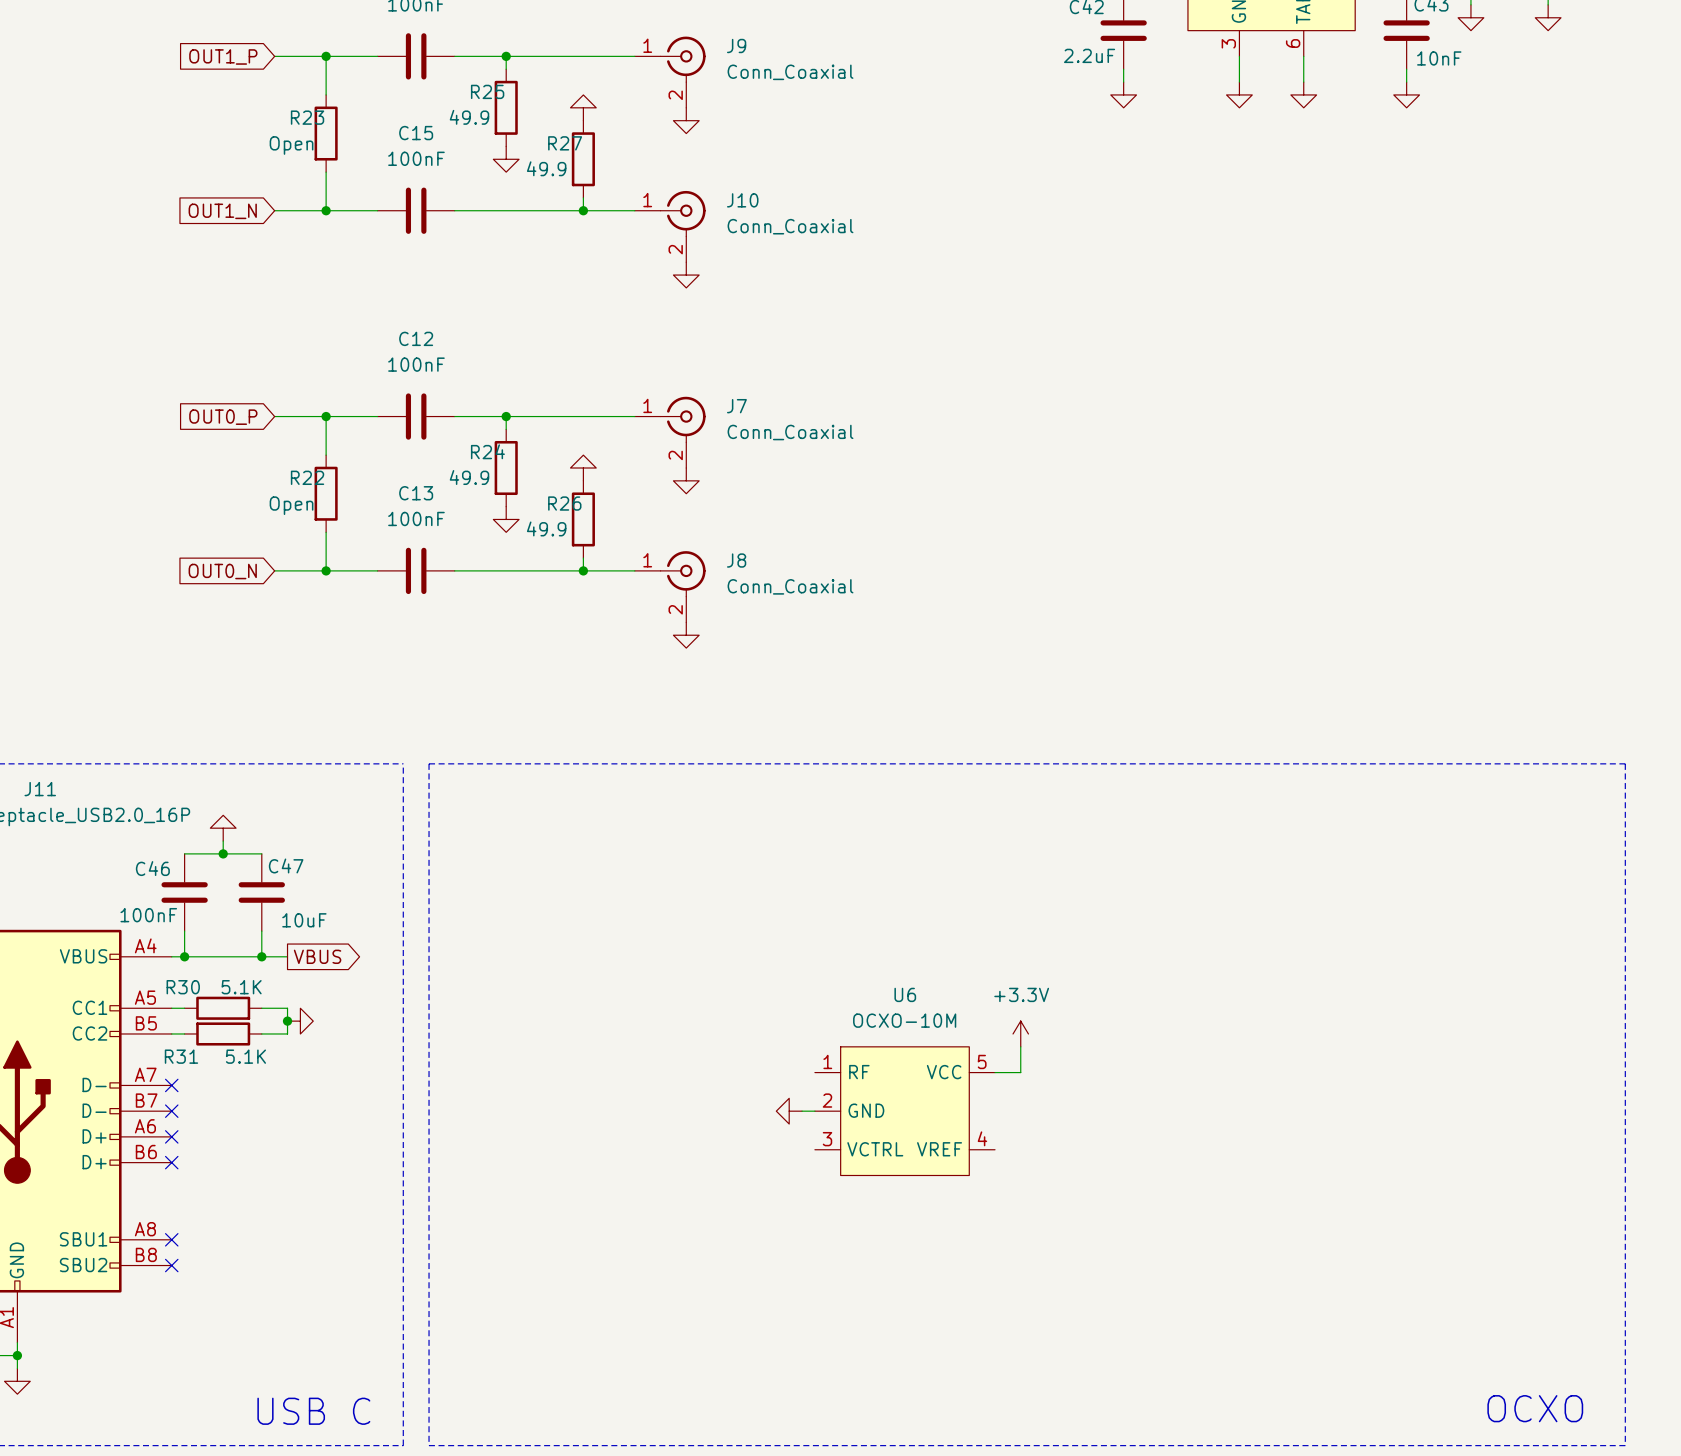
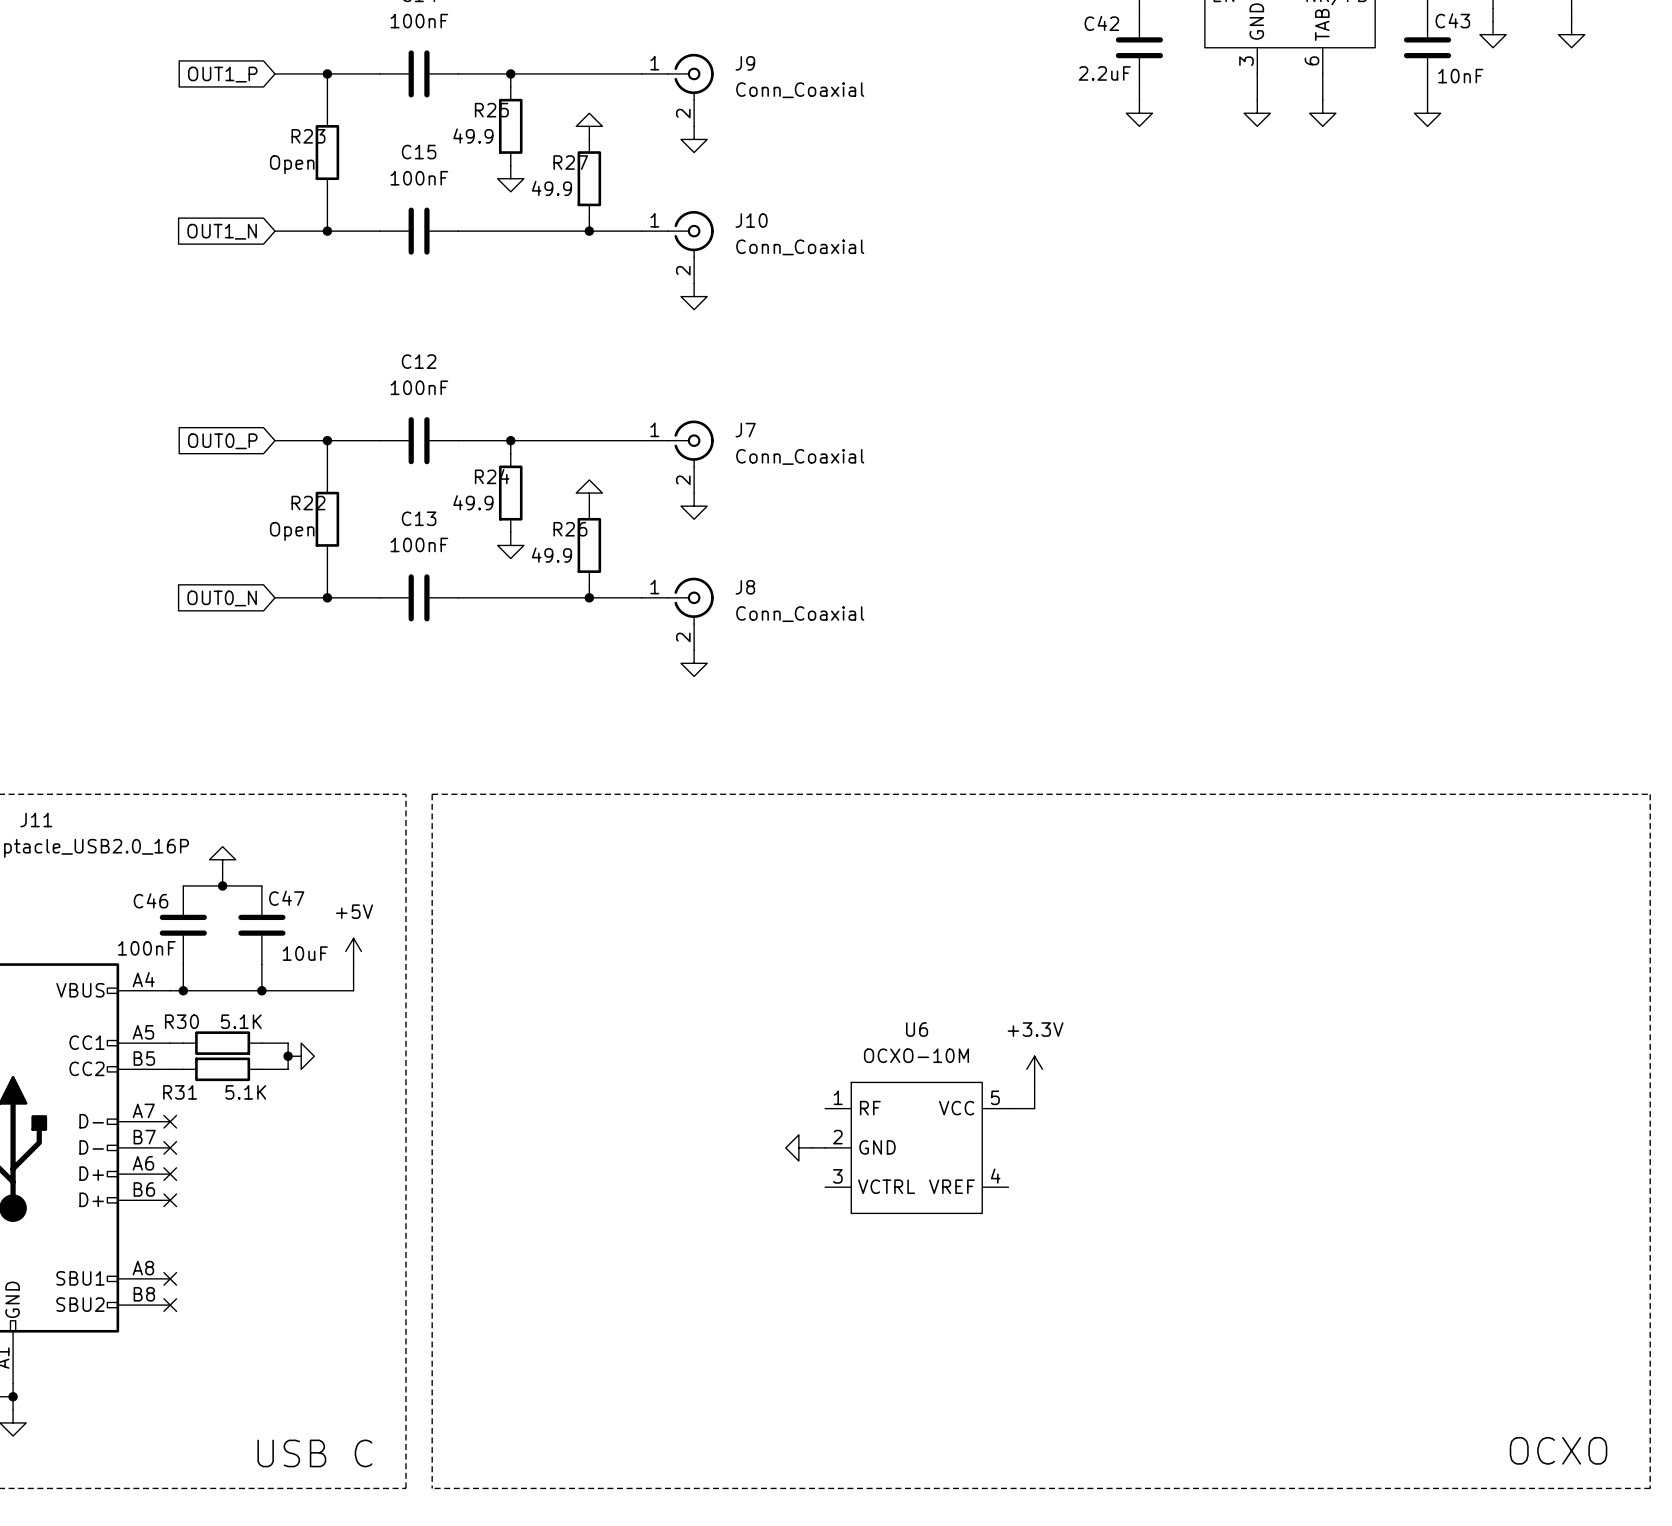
power symbol: none -> +5V (353, 951)
wire: none -> (353, 964) (353, 990) (288, 990)
global label: VBUS (317, 956) -> none

